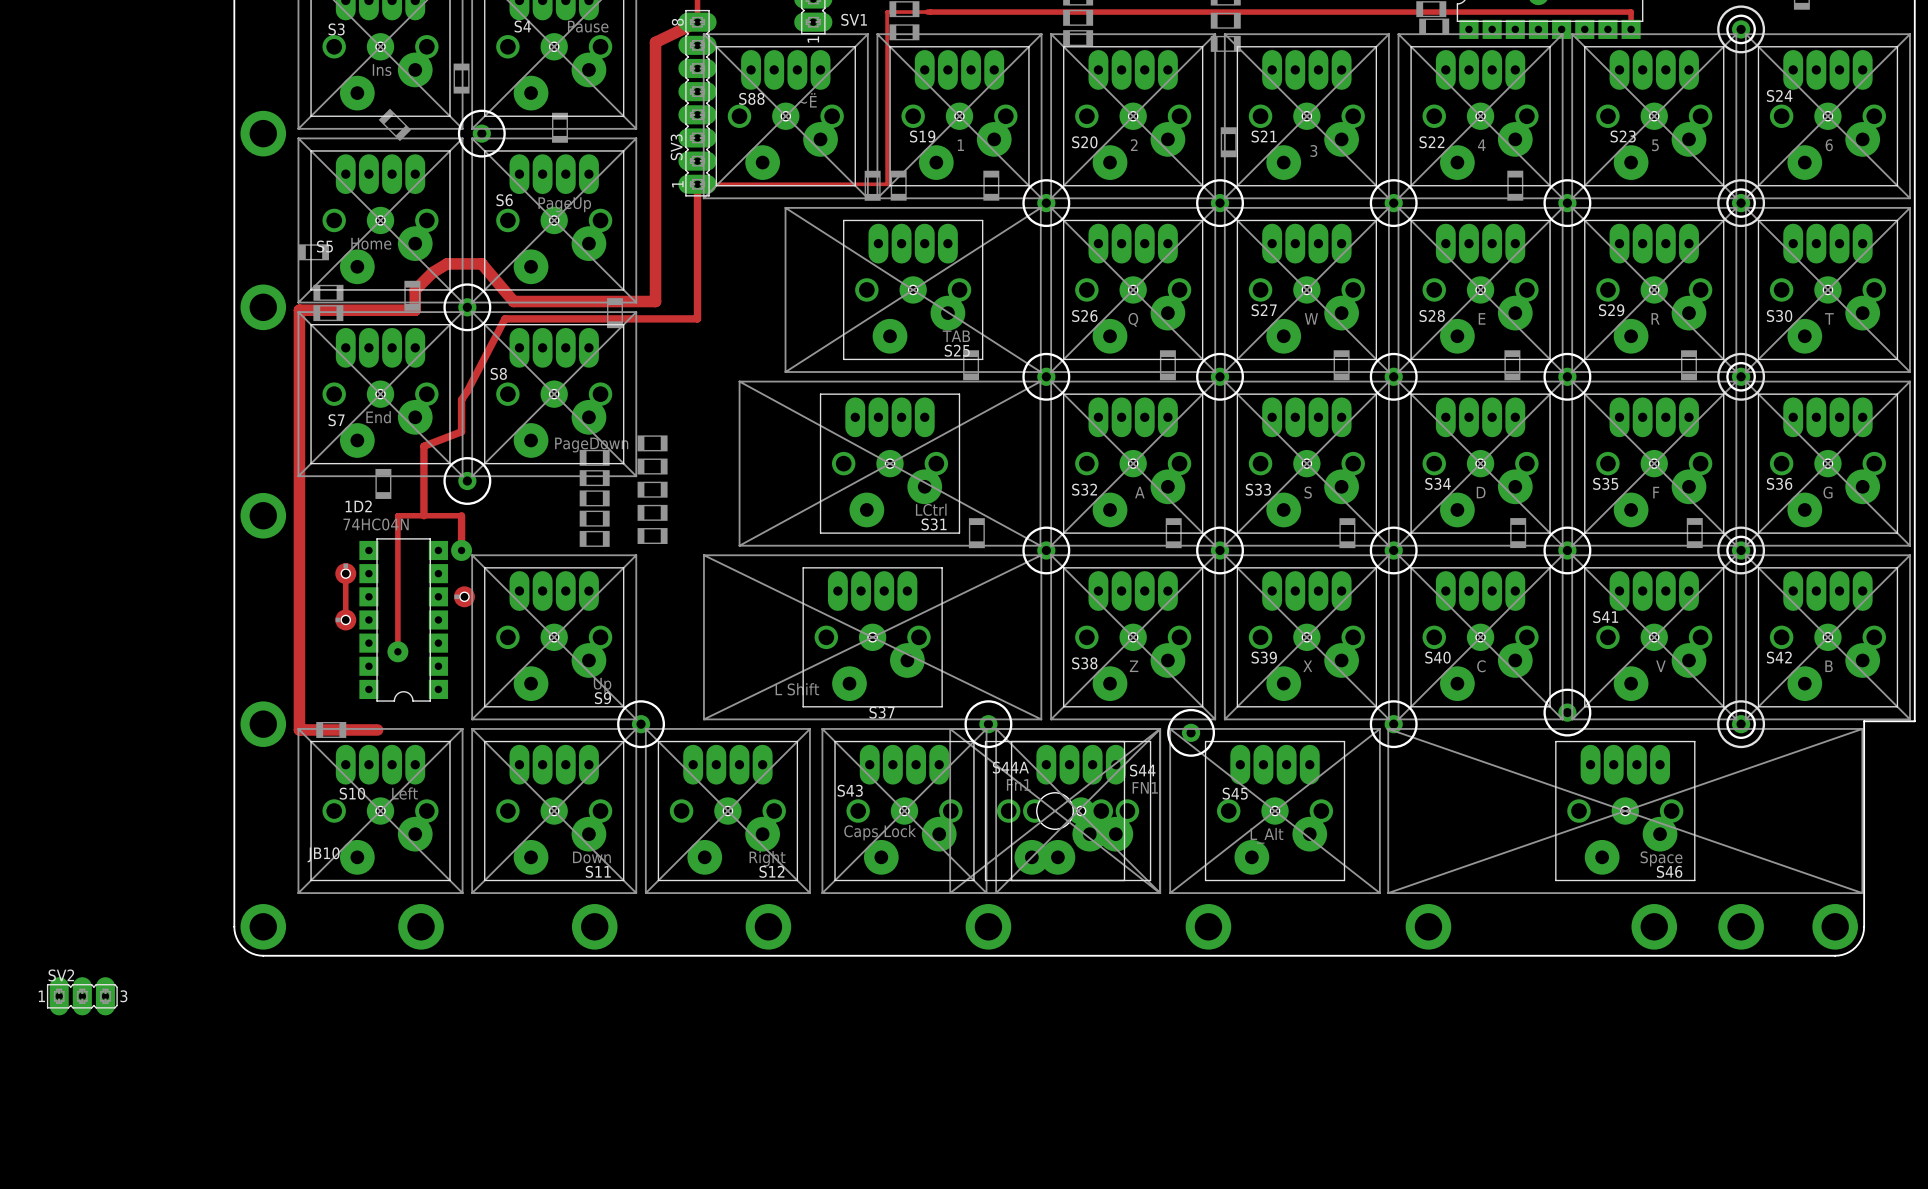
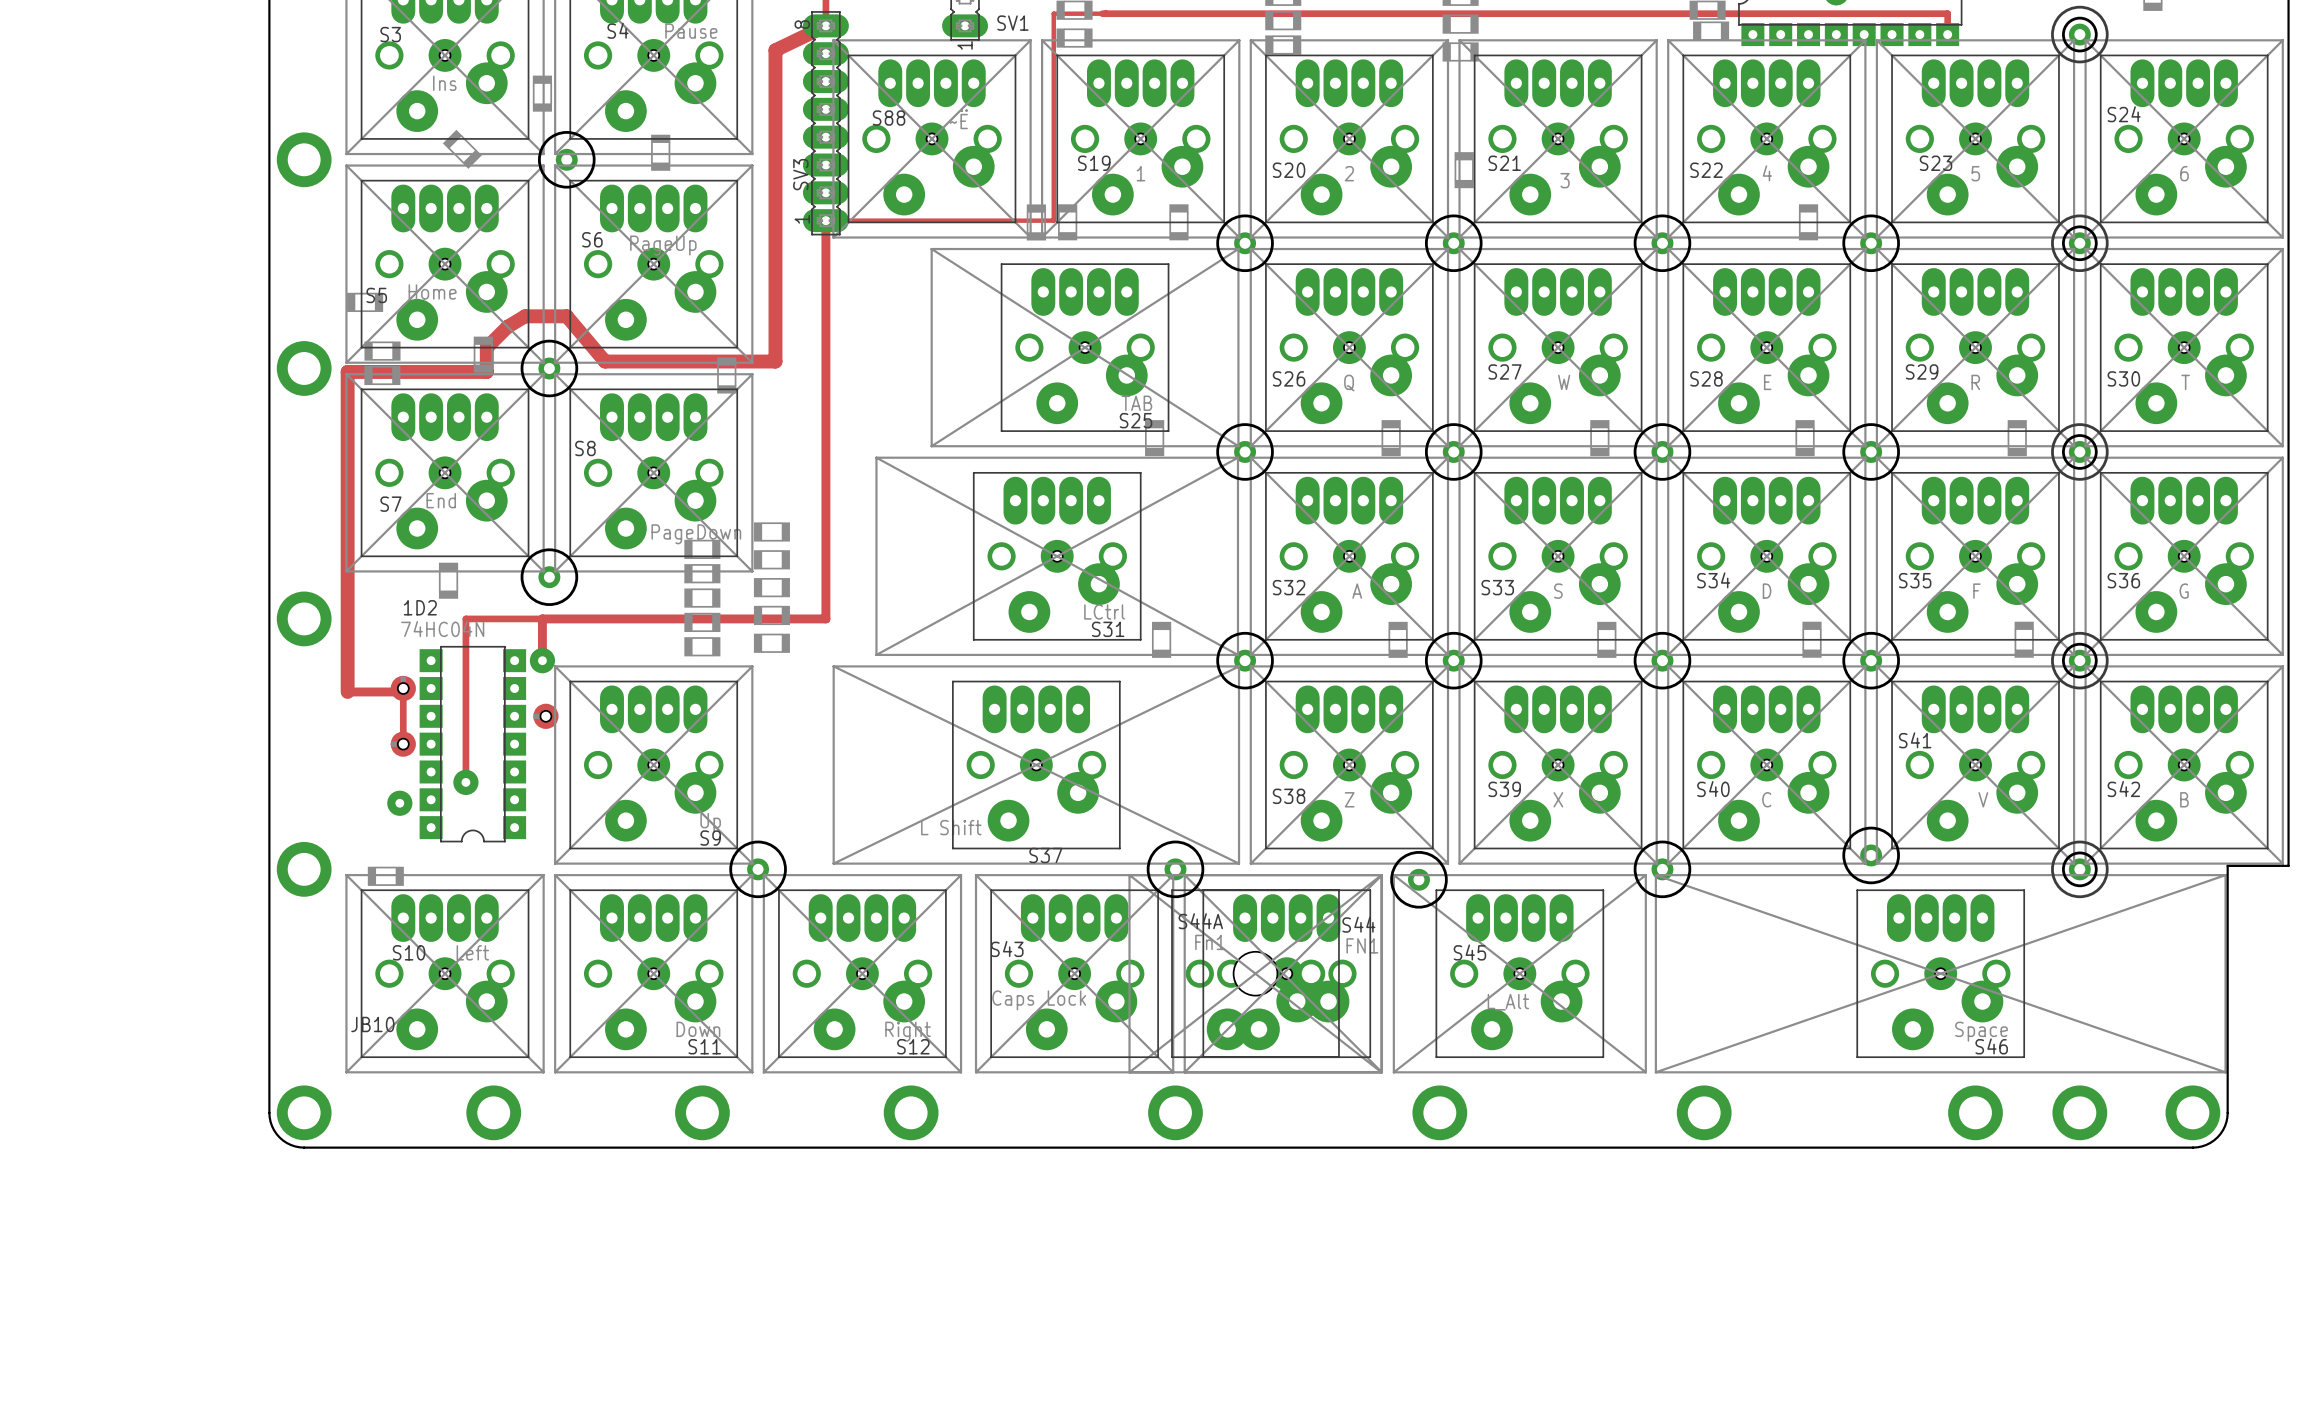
track: (697, 318) (504, 318) (461, 399) (461, 431) (423, 446) (423, 515) -> (825, 382) (825, 618) (542, 618)
track: (299, 576) (299, 729) (377, 729) -> (347, 691) (403, 691)
via: none -> (399, 803)
SV2: (82, 996) -> none

